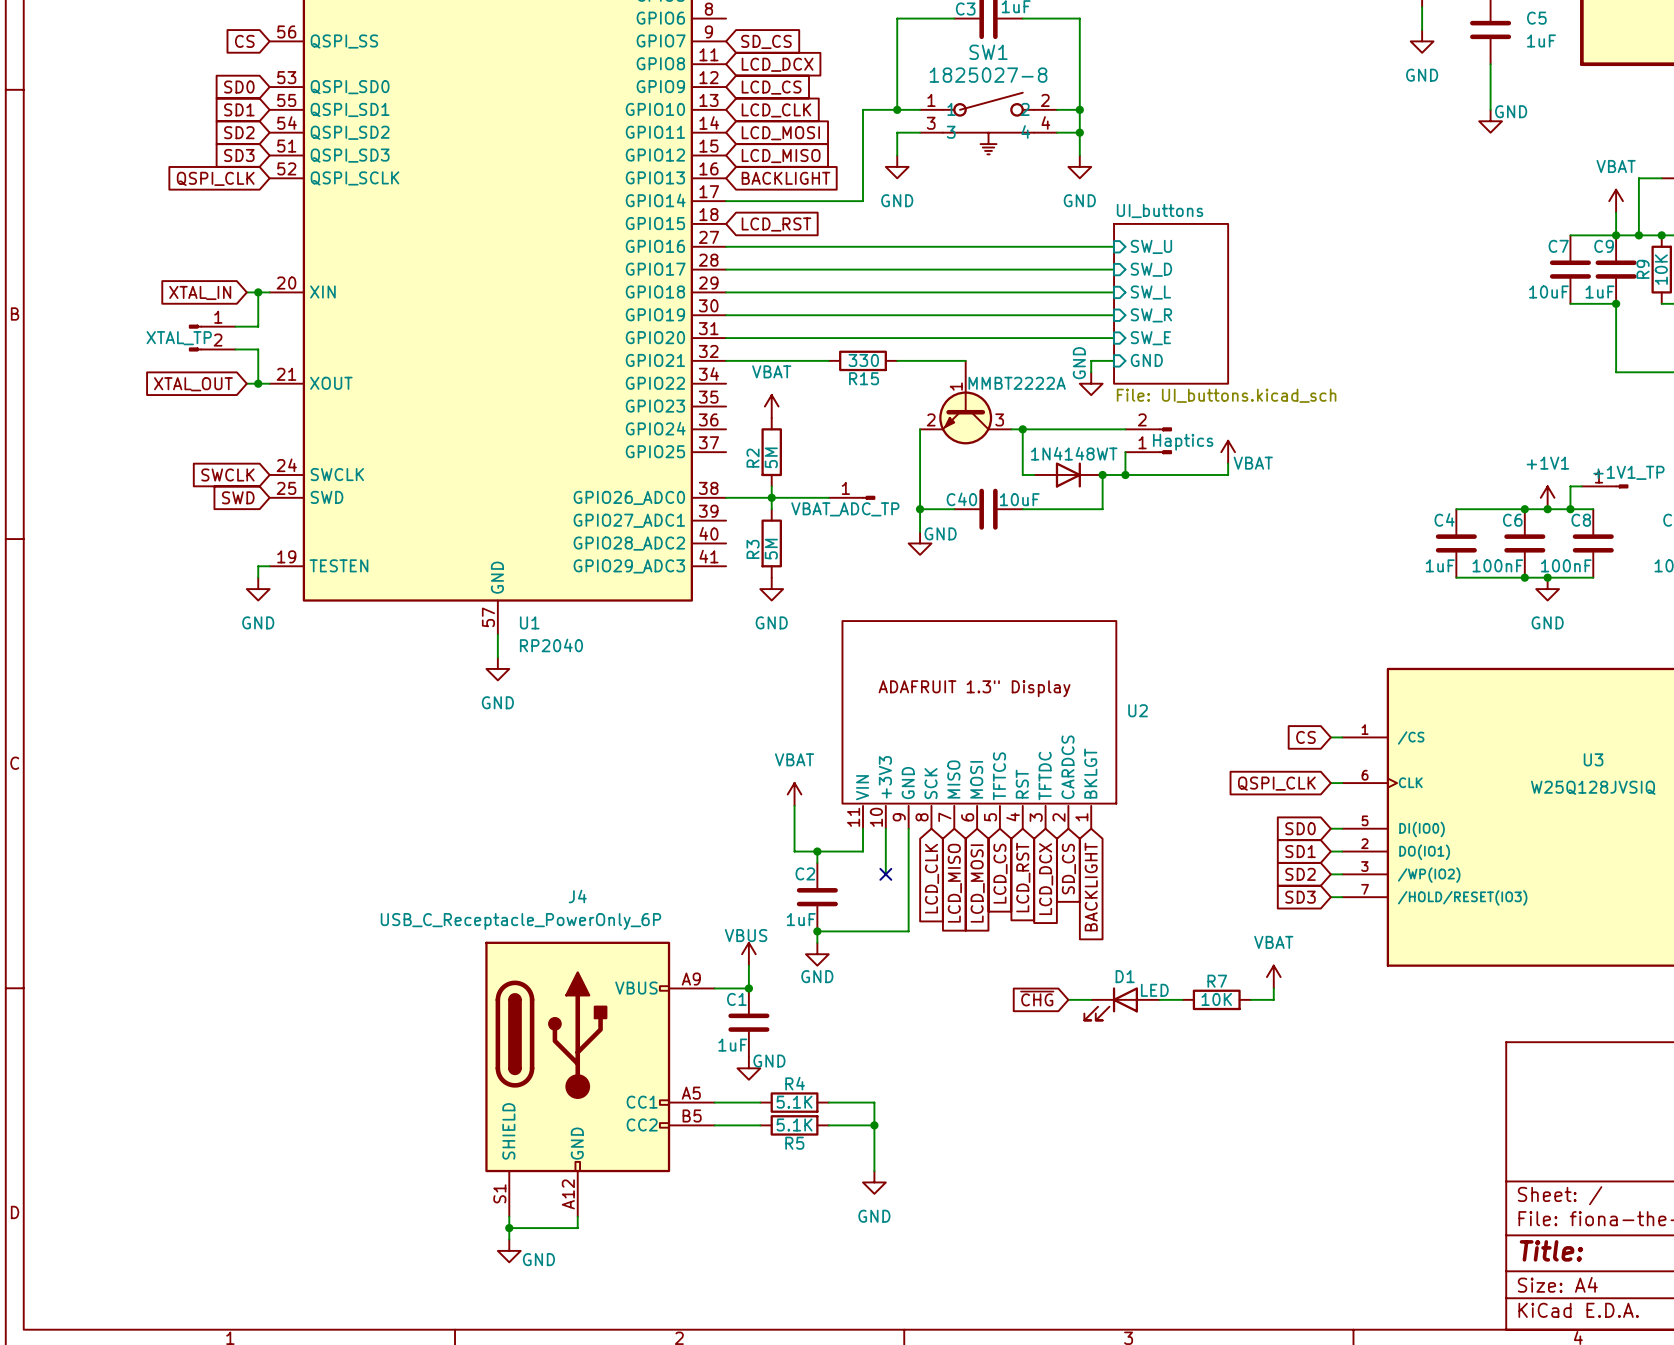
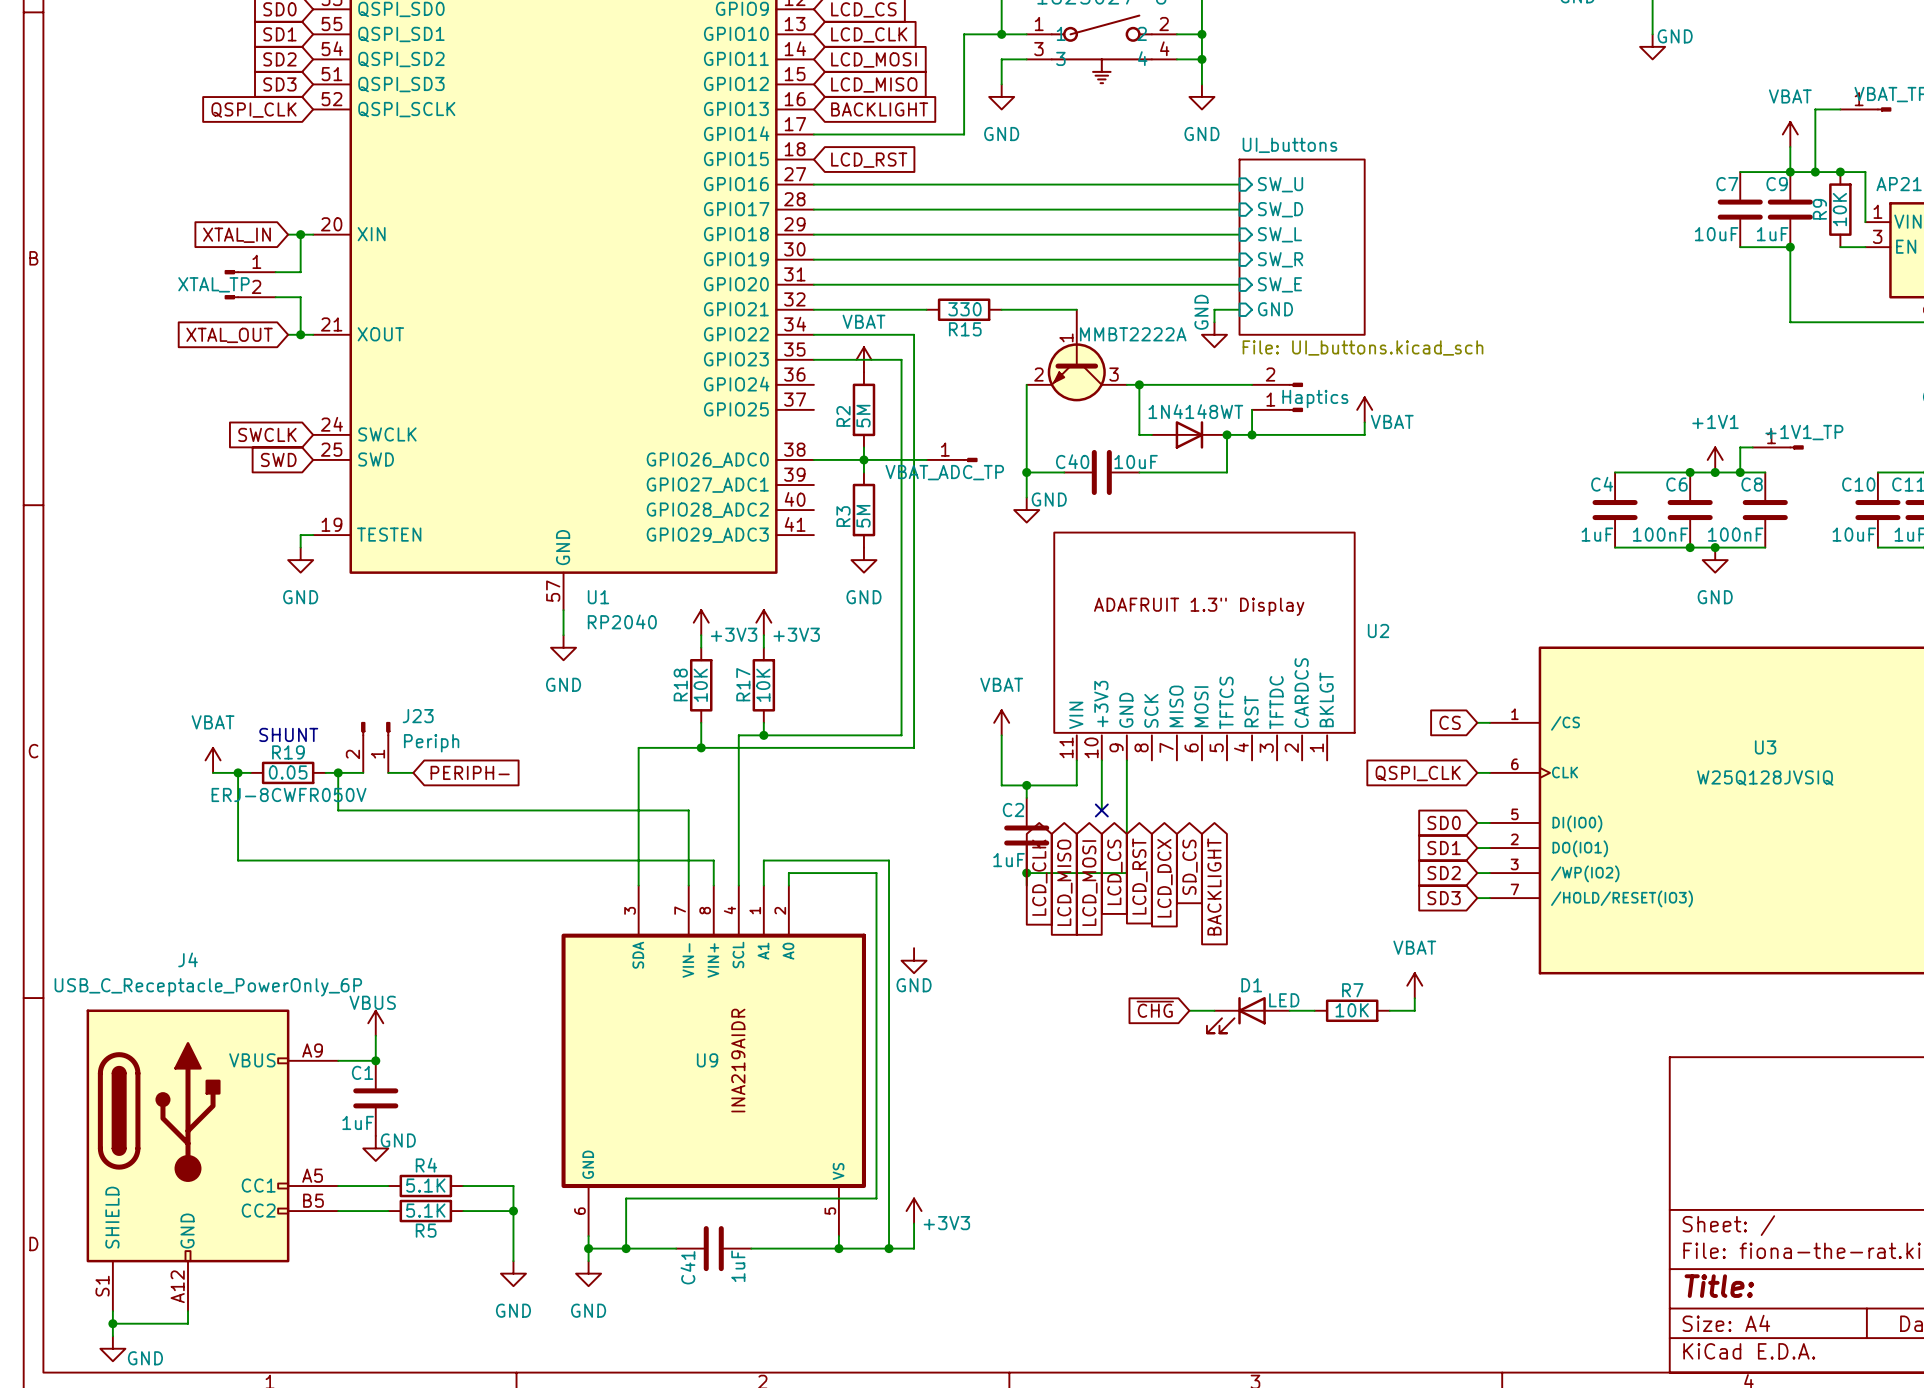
wire: none -> (813, 334) (914, 334) (914, 747) (638, 747) (638, 885)
wire: none -> (813, 359) (901, 359) (901, 735) (738, 735) (738, 885)
power symbol: none -> +3V3 (701, 622)
power symbol: none -> +3V3 (763, 622)
wire: none -> (701, 635) (701, 647)
wire: none -> (763, 635) (763, 647)
R18: none -> 10K (701, 685)
R17: none -> 10K (763, 685)
U2 position: (979, 724) -> (1204, 646)
wire: none -> (701, 722) (701, 747)
wire: none -> (763, 722) (763, 735)
text: none -> SHUNT (288, 734)
junction: none -> (763, 735)
J23: none -> Periph (375, 747)
junction: none -> (701, 747)
power symbol: none -> VBAT (213, 760)
wire: none -> (213, 772) (250, 772)
wire: none -> (238, 772) (238, 860) (713, 860) (713, 885)
junction: none -> (238, 772)
R19: none -> 0.05 (288, 772)
wire: none -> (325, 772) (363, 772)
wire: none -> (338, 772) (338, 810) (688, 810) (688, 885)
junction: none -> (338, 772)
wire: none -> (388, 772) (413, 772)
global label: none -> PERIPH- (470, 772)
power symbol position: VBAT (794, 794) -> VBAT (1001, 722)
junction: none -> (1026, 785)
wire: (794, 805) (794, 851) (863, 851) (863, 828) -> (1001, 735) (1001, 785) (1076, 785) (1076, 760)
no-connect mark: none -> (1101, 810)
wire: (885, 828) (885, 874) -> (1101, 760) (1101, 810)
wire: (908, 828) (908, 931) (817, 931) (817, 942) -> (1126, 760) (1126, 873) (1026, 873) (1026, 885)
wire: (817, 851) (817, 862) -> (1026, 785) (1026, 797)
junction: (817, 851) -> none
no-connect mark: (885, 874) -> none
junction: none -> (1026, 873)
wire: none -> (763, 885) (763, 860) (889, 860) (889, 1248)
wire: none -> (788, 885) (788, 873) (876, 873) (876, 1198) (626, 1198) (626, 1248)
C2 position: (817, 897) -> (1026, 835)
J4 value position: USB_C_Receptacle_PowerOnly_6P (520, 921) -> USB_C_Receptacle_PowerOnly_6P (208, 987)
junction: (817, 931) -> none
power symbol: VBUS (748, 954) -> none
junction: (748, 988) -> none
power symbol: none -> VBUS (375, 1023)
wire: none -> (375, 1035) (375, 1060) (338, 1060)
C1 position: (748, 1022) -> (375, 1098)
junction: none -> (375, 1060)
U9: none -> (713, 1060)
power symbol: GND (748, 1068) -> none
J4 position: (599, 1079) -> (212, 1160)
R4 position: (794, 1102) -> (425, 1186)
wire: (828, 1102) (874, 1102) (874, 1171) -> none
power symbol: none -> GND (375, 1148)
R5 position: (794, 1125) -> (425, 1211)
wire: (828, 1125) (874, 1125) -> none
junction: (874, 1125) -> none
wire: none -> (338, 1186) (388, 1186)
wire: none -> (463, 1186) (513, 1186) (513, 1261)
wire: none -> (338, 1211) (388, 1211)
wire: none -> (463, 1211) (513, 1211)
junction: none -> (513, 1211)
power symbol: none -> +3V3 (914, 1211)
power symbol: GND (874, 1182) -> none
wire: none -> (914, 1223) (914, 1248) (751, 1248)
wire: none -> (838, 1236) (838, 1248)
wire: (509, 1216) (509, 1239) -> (588, 1236) (588, 1261)
wire: none -> (588, 1248) (676, 1248)
junction: none -> (626, 1248)
wire: (577, 1216) (577, 1228) (509, 1228) -> none
C41: none -> 1uF (713, 1248)
junction: none -> (838, 1248)
junction: none -> (889, 1248)
junction position: (509, 1228) -> (588, 1248)
power symbol: none -> GND (513, 1273)
power symbol position: GND (509, 1250) -> GND (588, 1273)
power symbol text position: GND (538, 1259) -> GND (588, 1310)
wire: none -> (112, 1311) (112, 1336)
wire: none -> (188, 1311) (188, 1323) (112, 1323)
junction: none -> (112, 1323)
power symbol: none -> GND (112, 1348)

